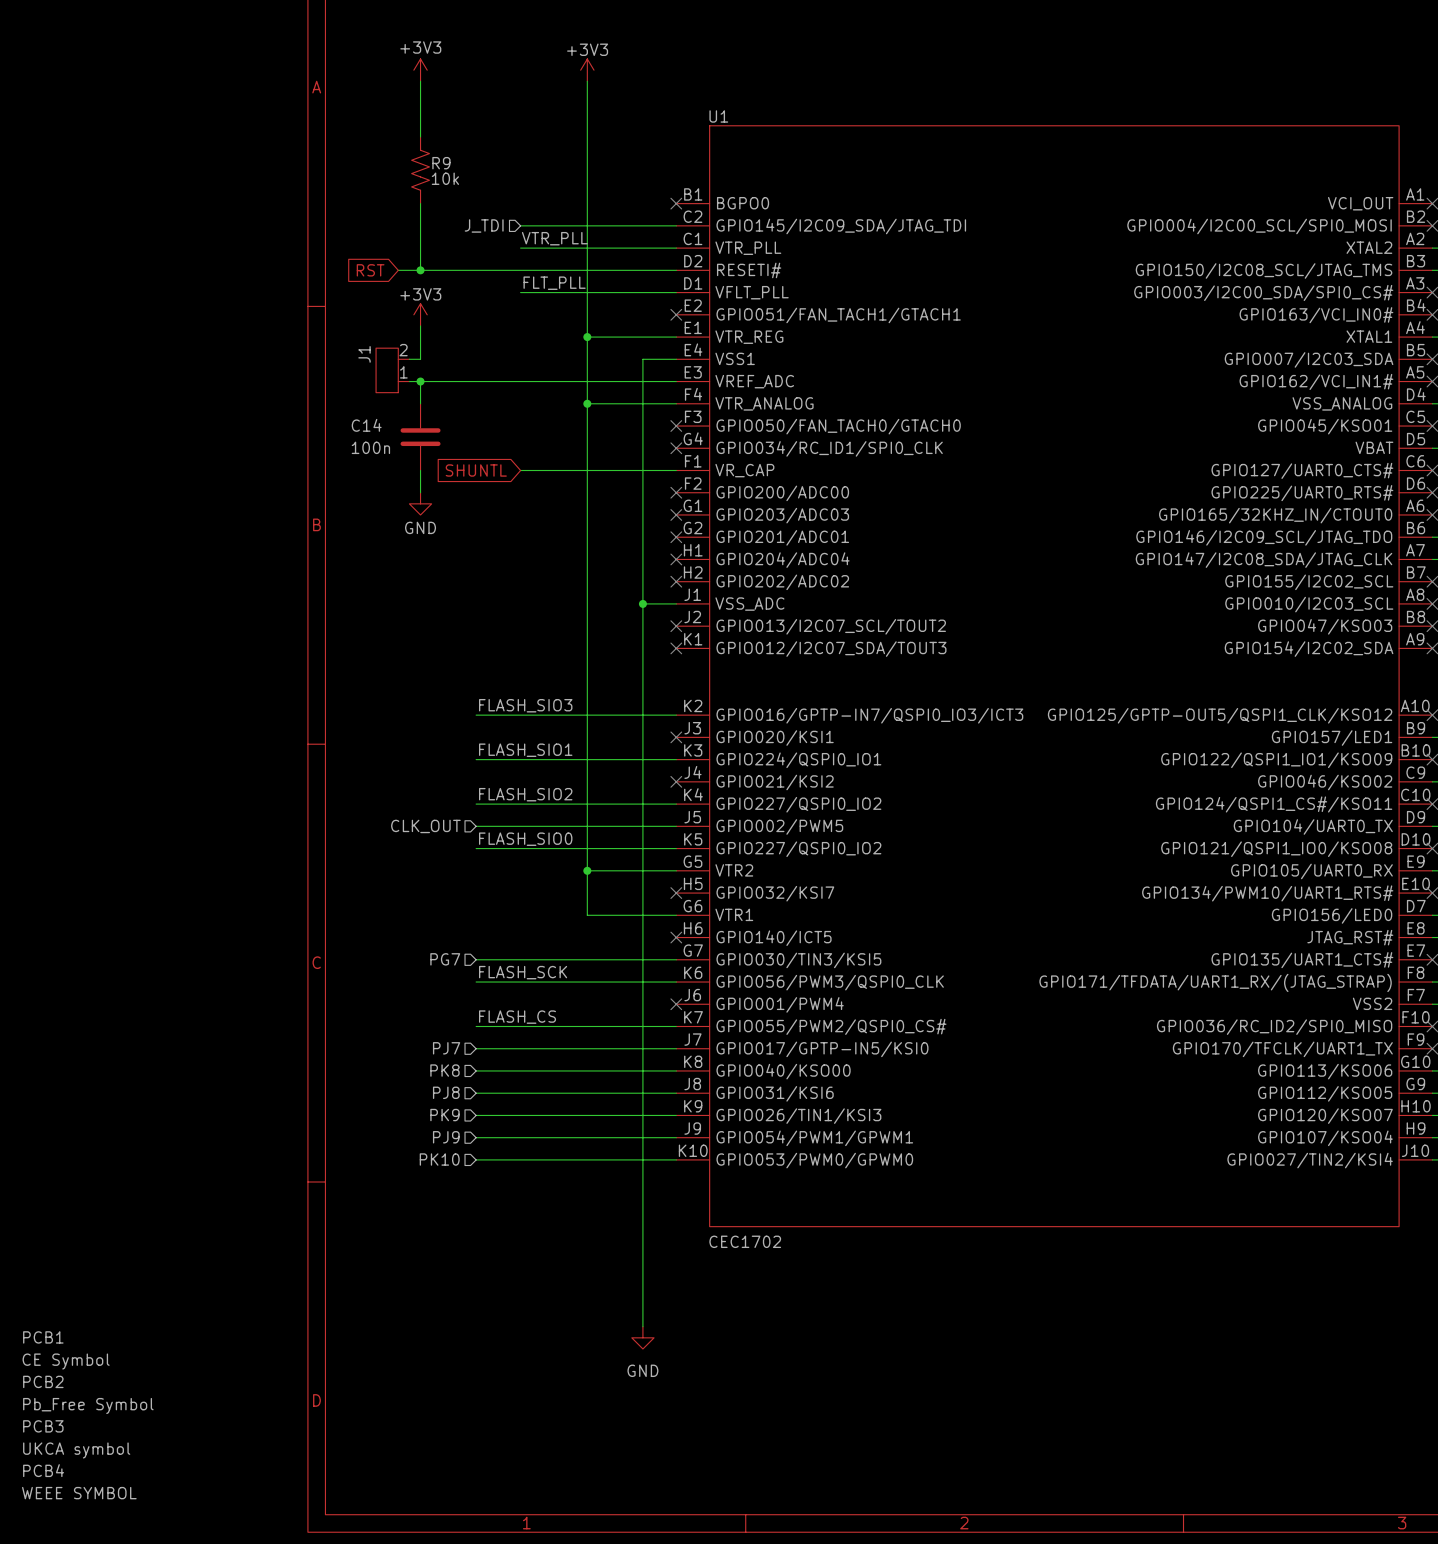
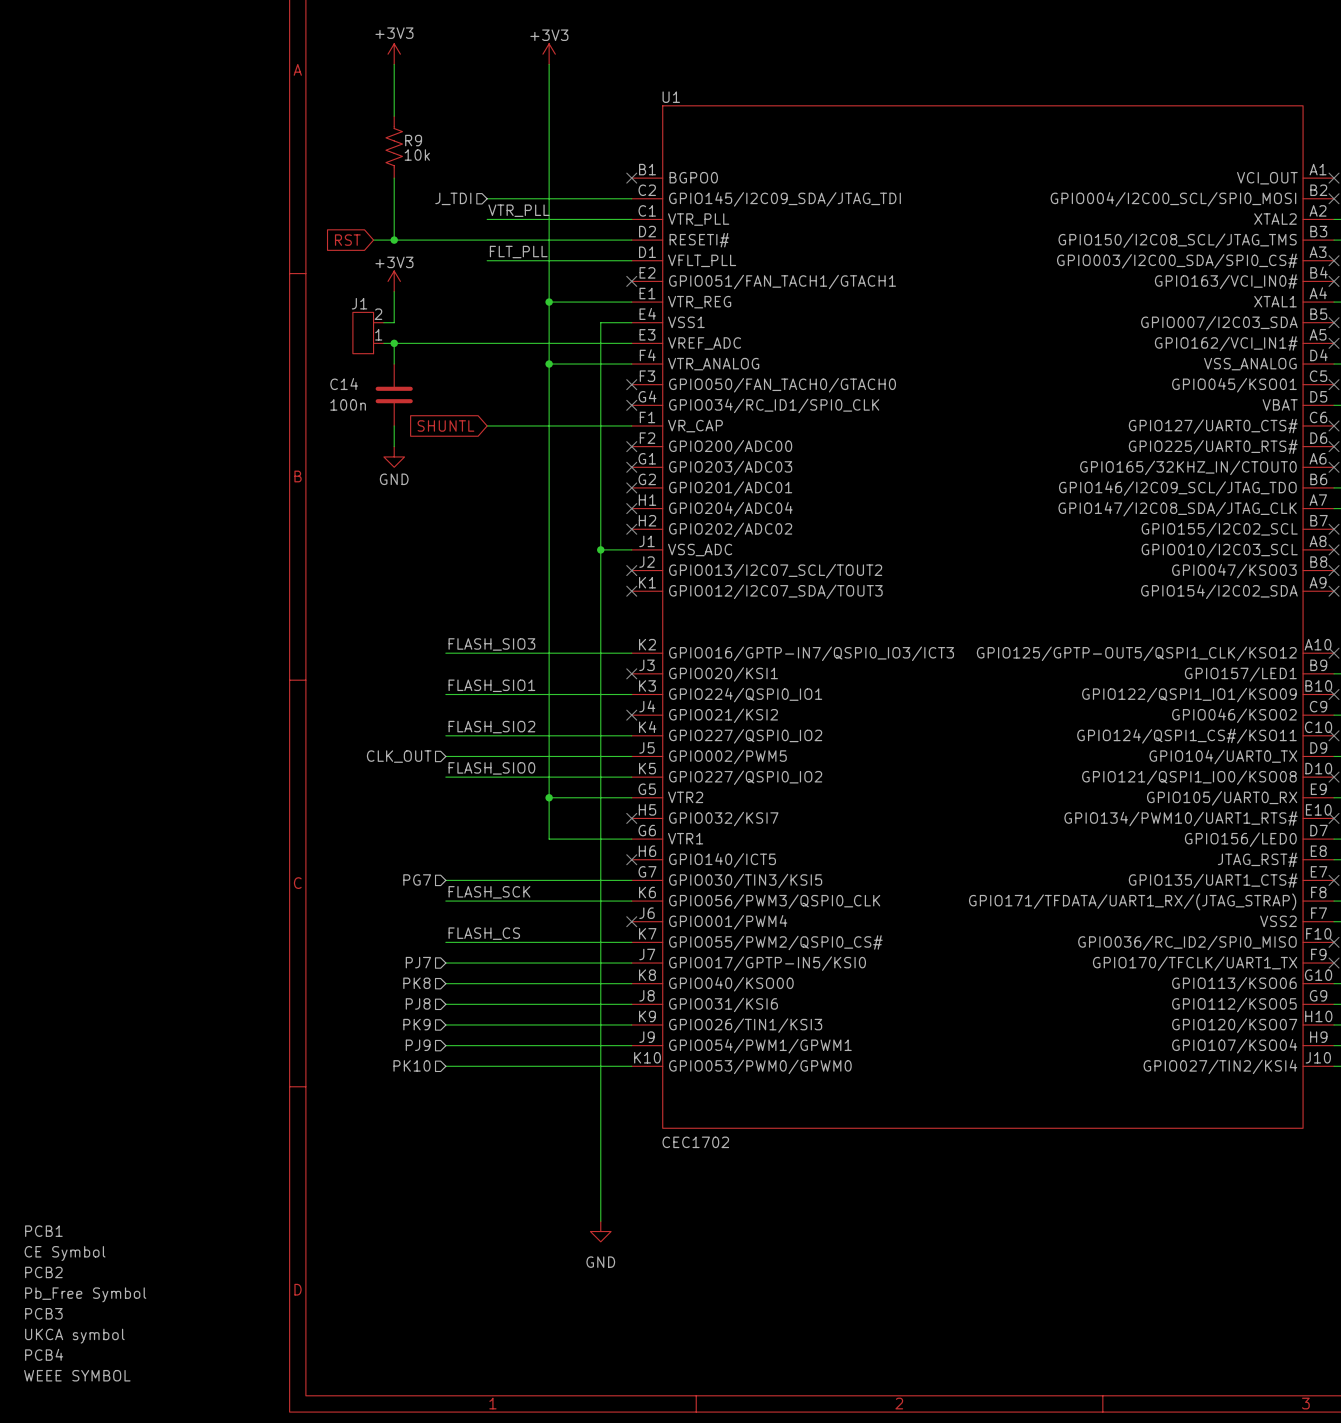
J1 name rotation: 0° (364, 354) -> 90° clockwise (359, 303)

